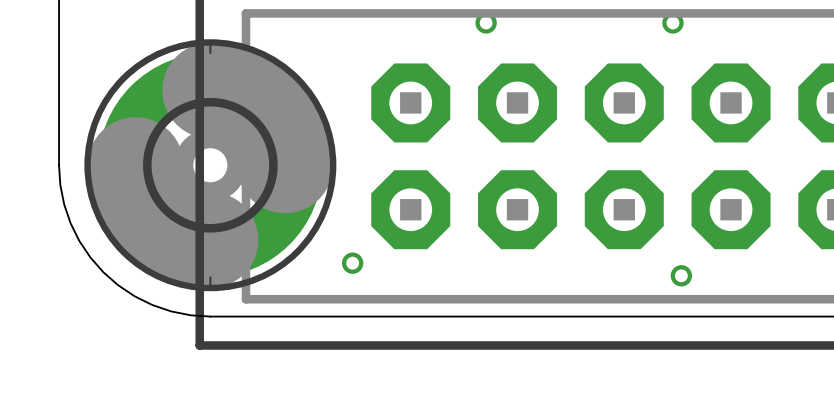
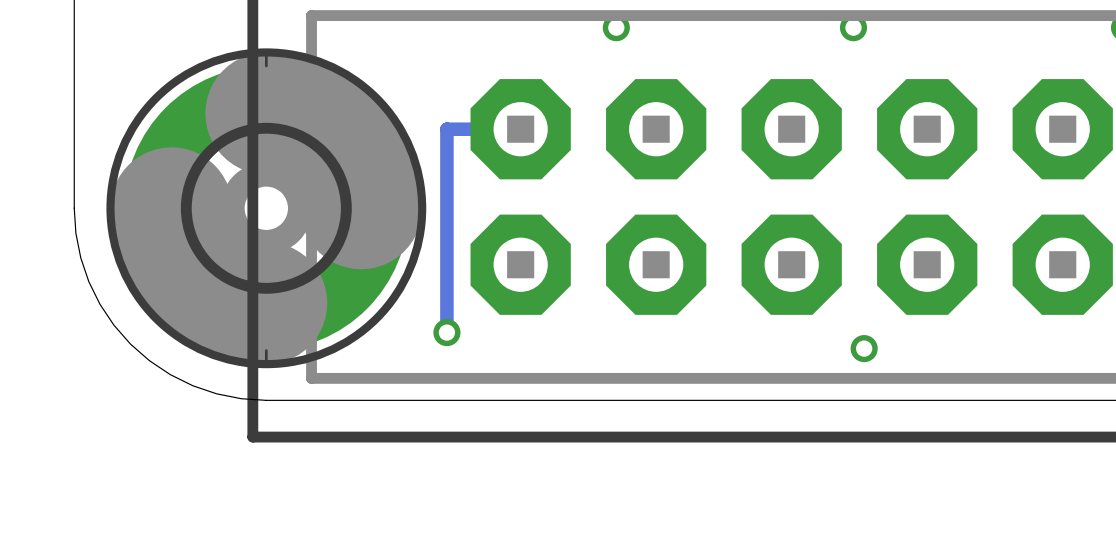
bottom track: none -> (520, 129) (447, 129) (446, 332)

